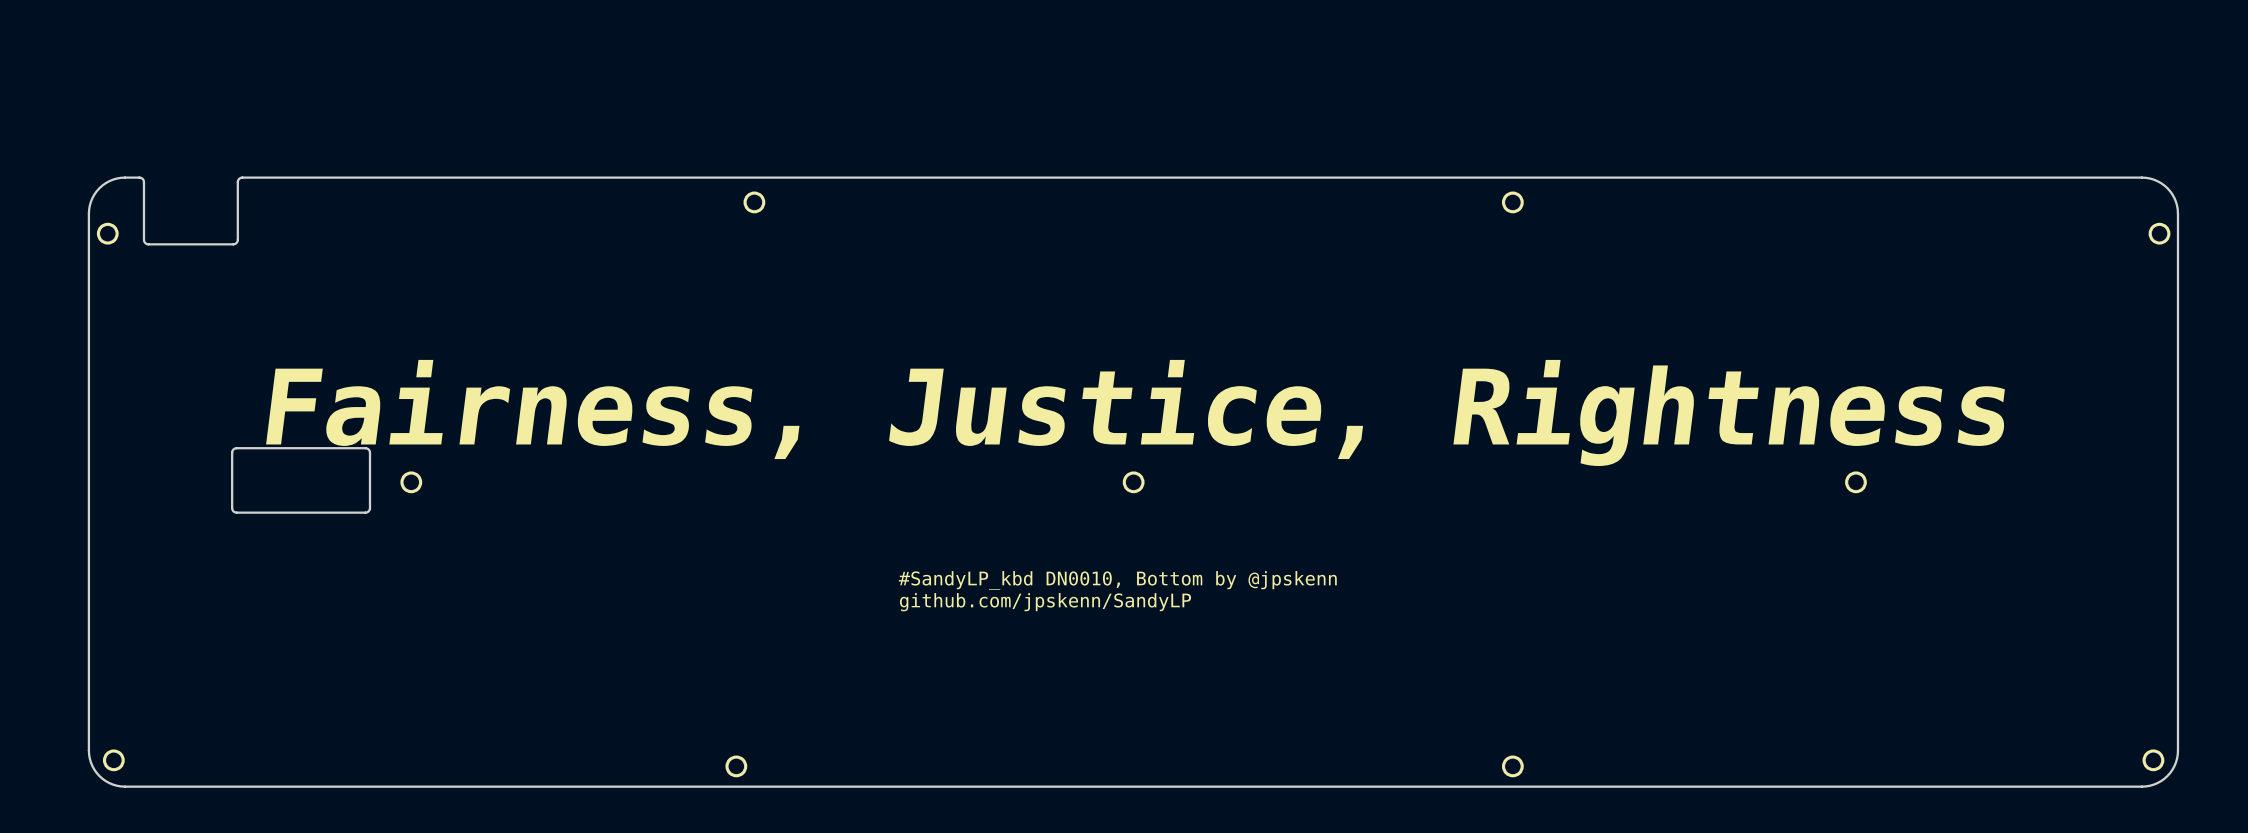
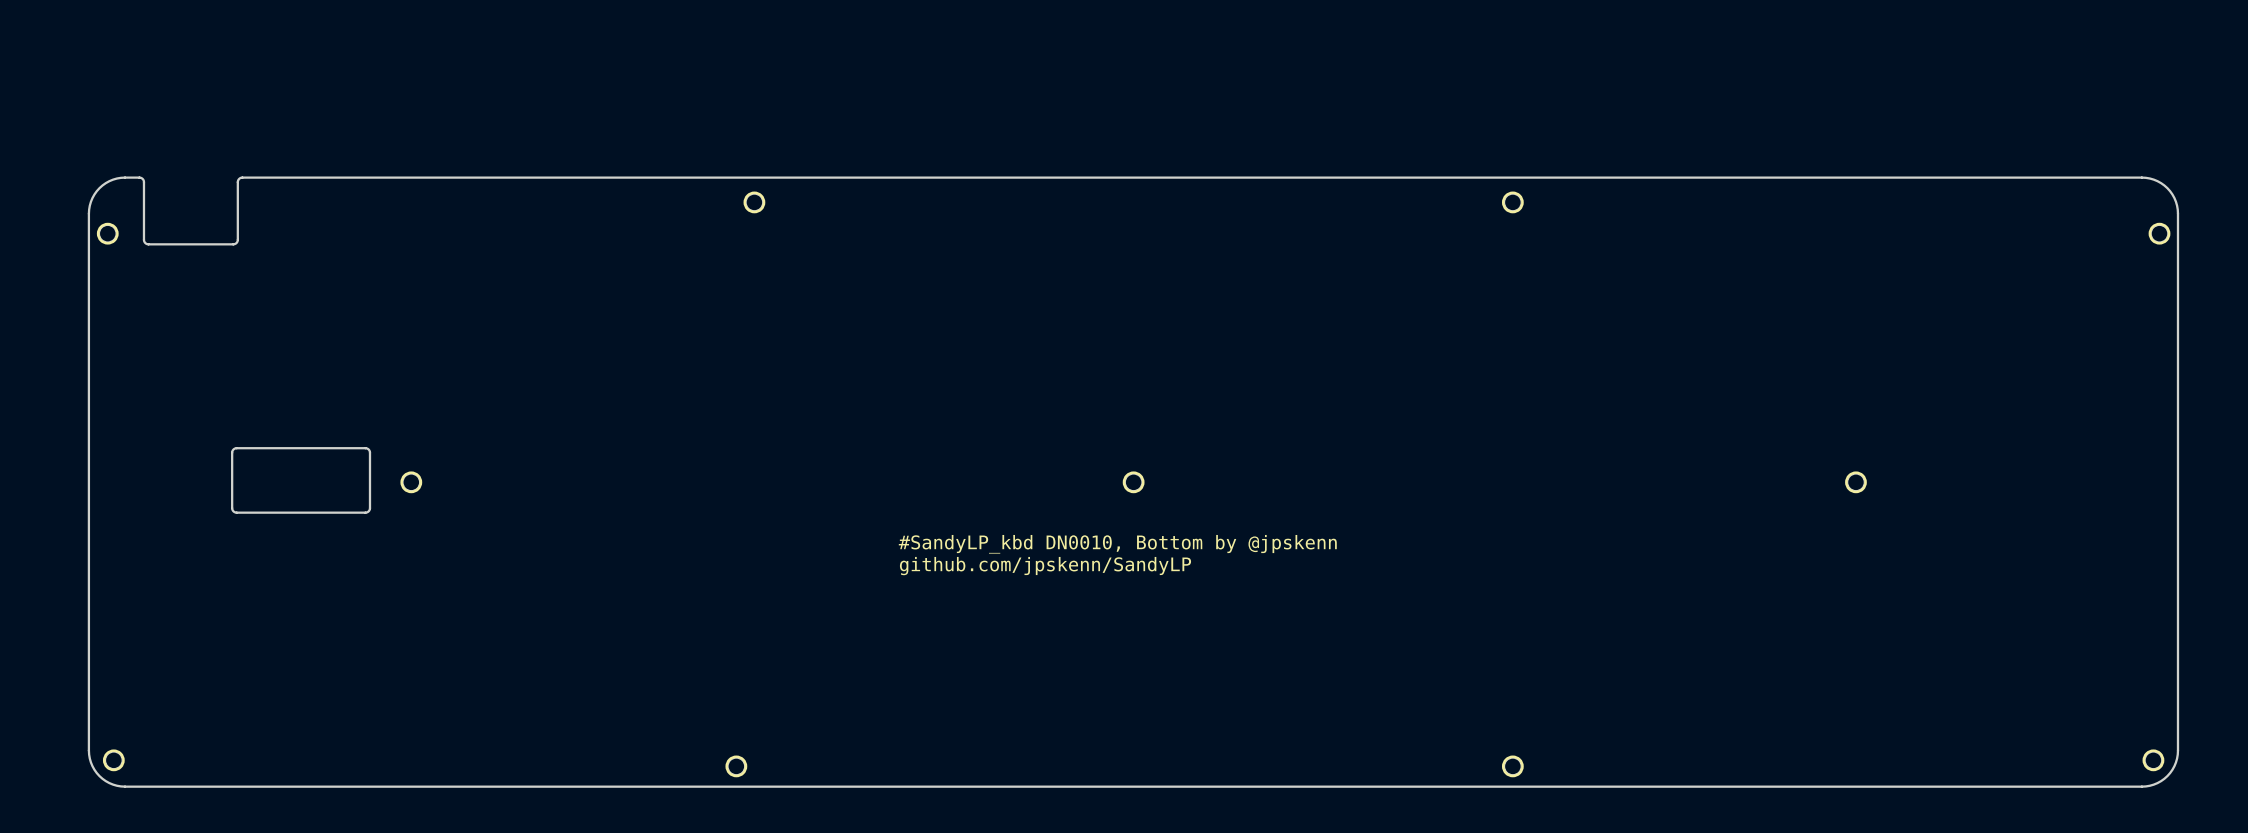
text: Fairness, Justice, Rightness (1135, 412) -> none
text position: #SandyLP_kbd DN0010, Bottom by @jpskenn (1117, 580) -> #SandyLP_kbd DN0010, Bottom by @jpskenn (1117, 544)
text position: github.com/jpskenn/SandyLP (1045, 602) -> github.com/jpskenn/SandyLP (1045, 566)

